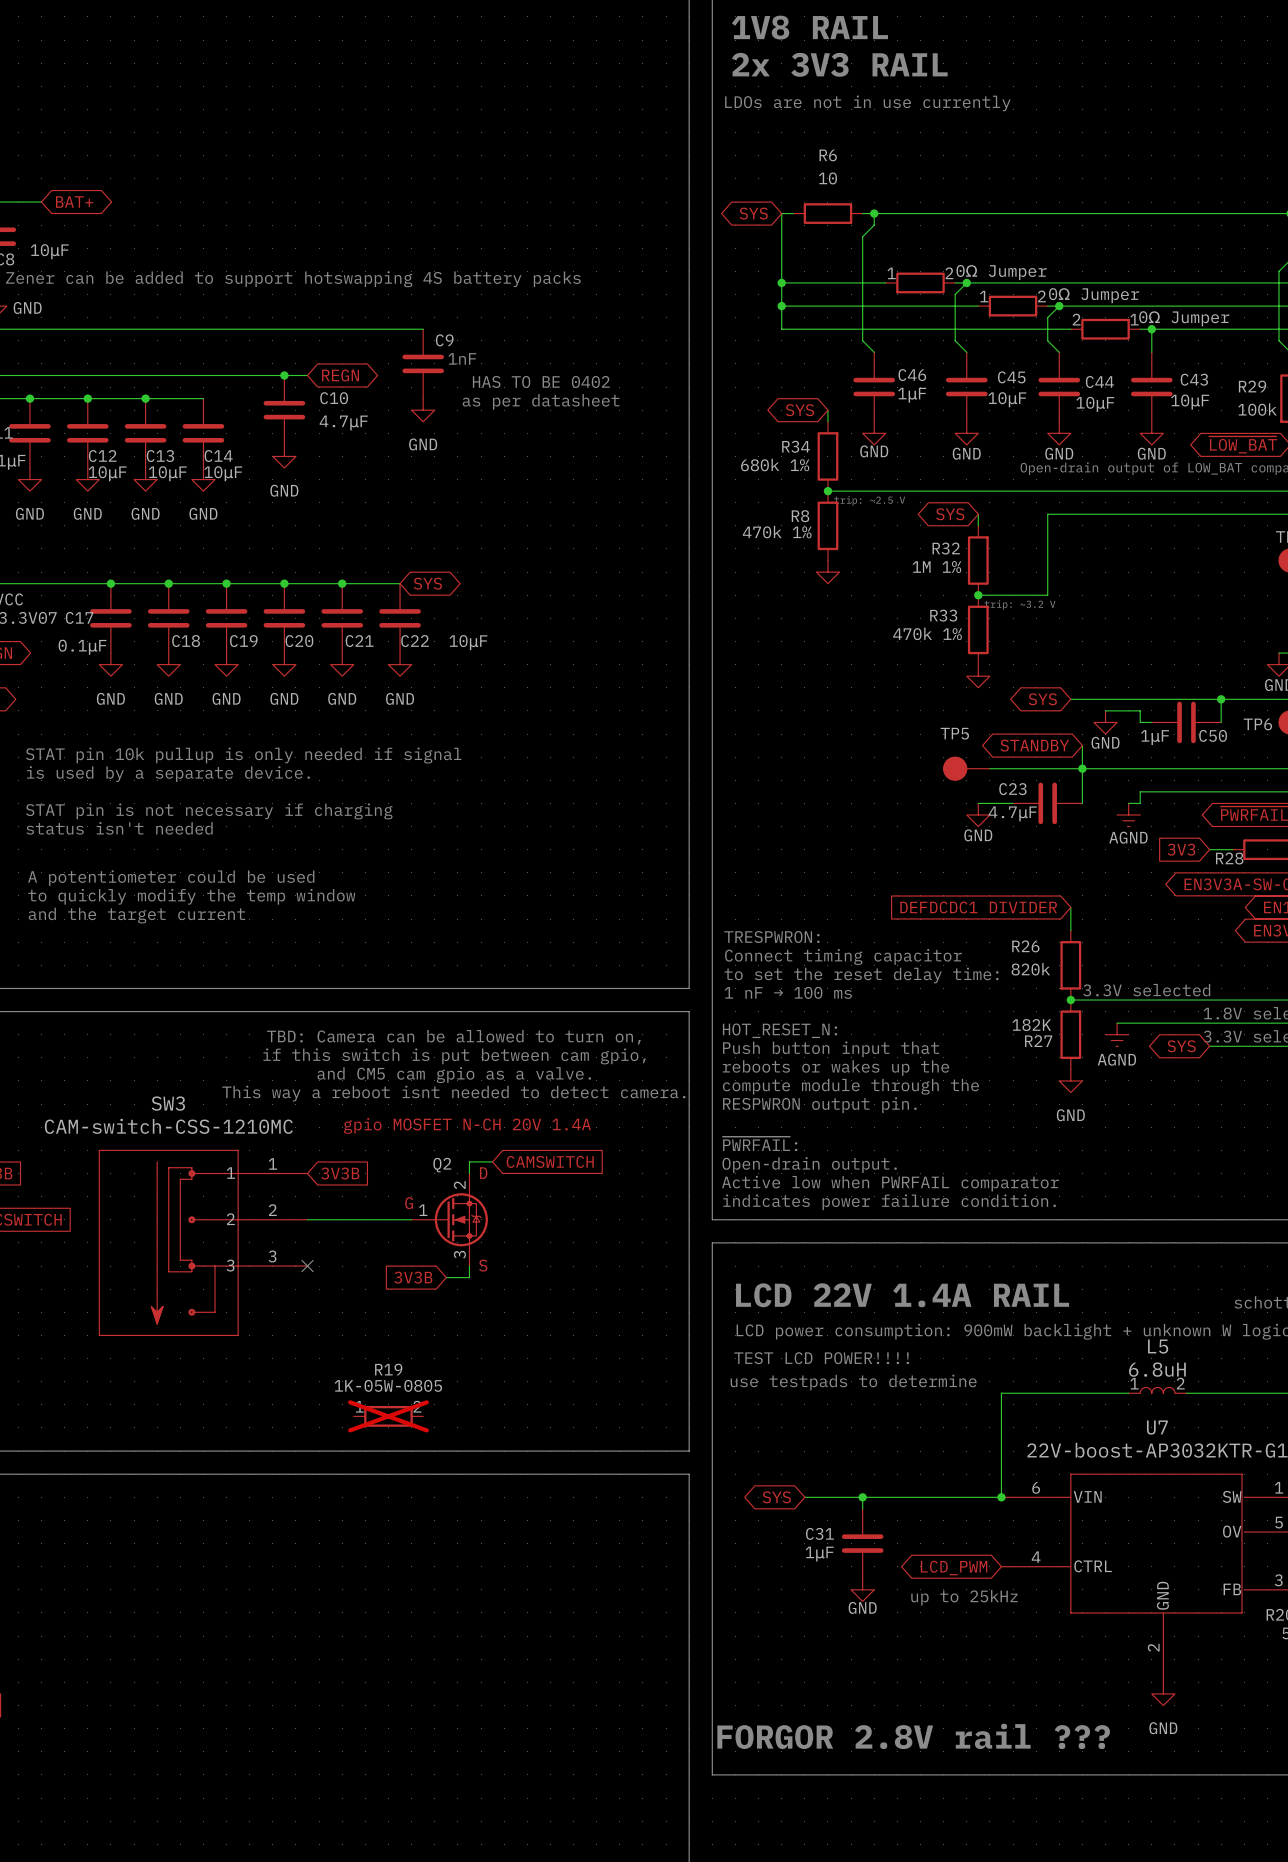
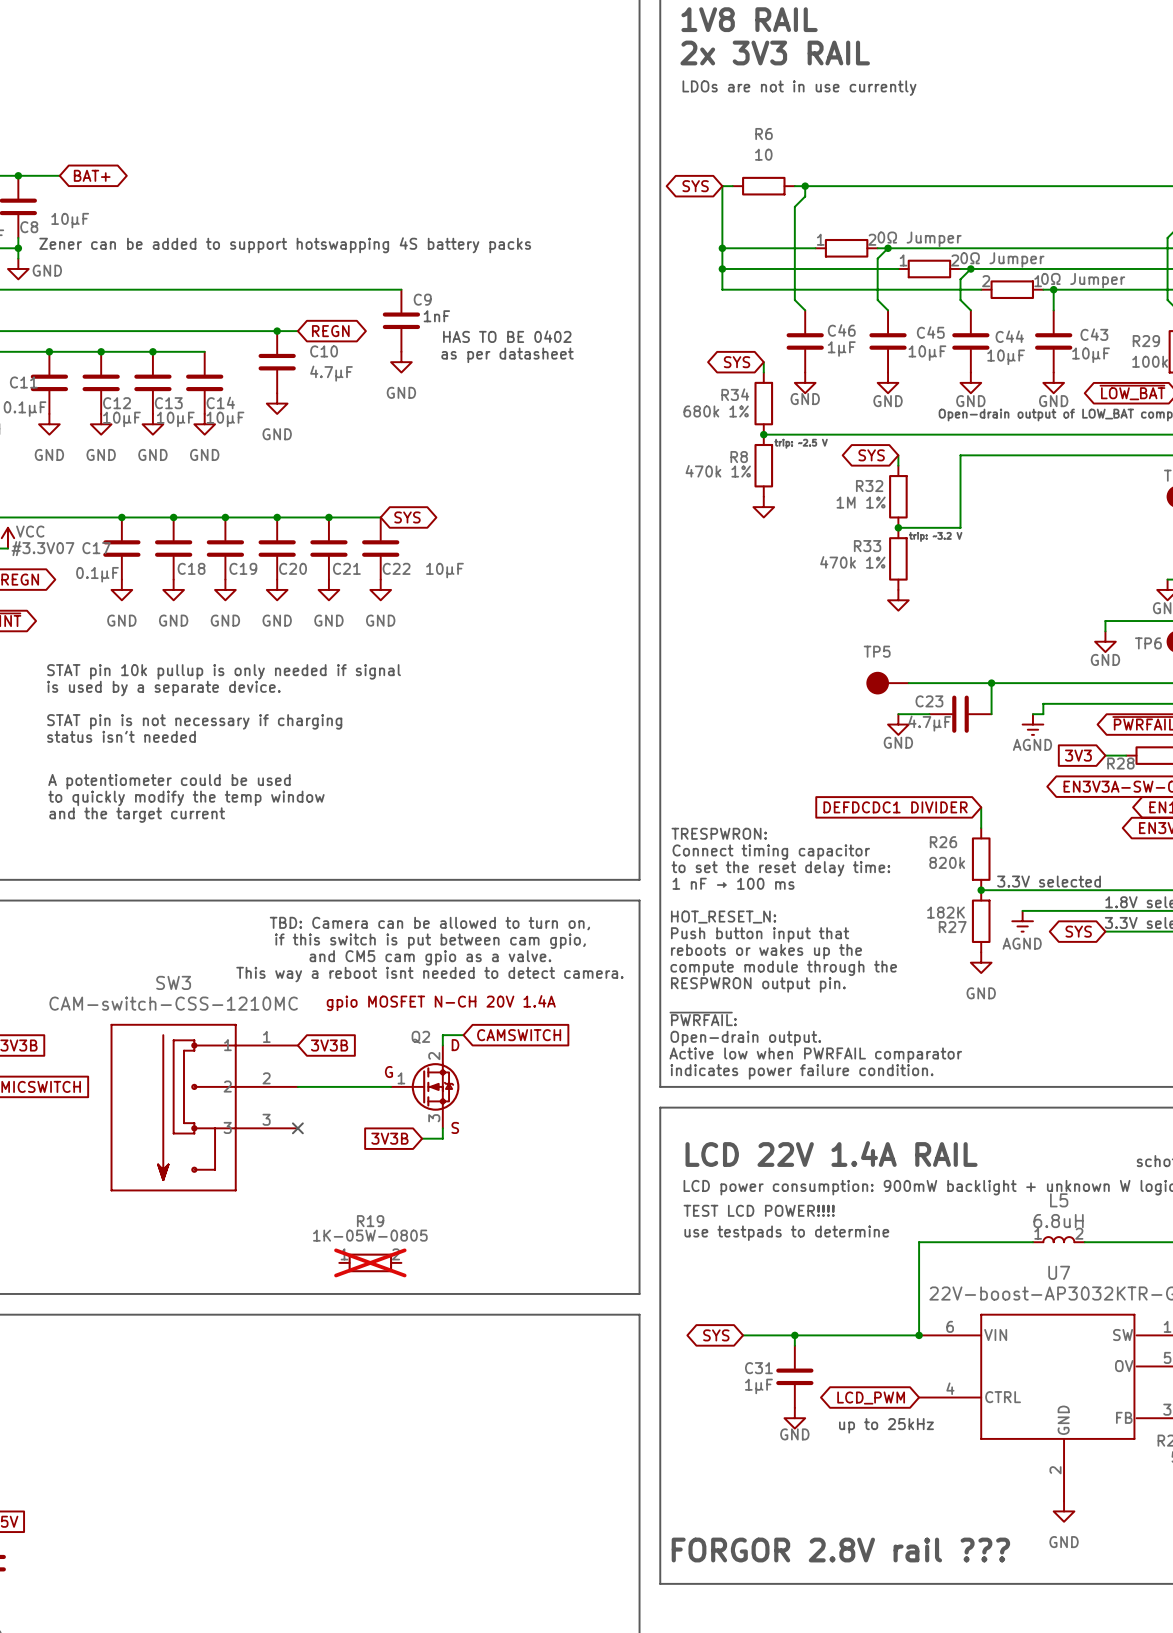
global label: SYS (1042, 699) -> none
wire: (1070, 699) (1209, 699) -> (1105, 631) (1105, 621)
wire: (1221, 699) (1221, 722) -> none
junction: (1221, 699) -> none
wire: (1105, 710) (1140, 710) (1140, 722) (1151, 722) -> none
power symbol position: GND (1105, 722) -> GND (1105, 641)
C50: 1μF (1186, 722) -> none
global label: STANDBY (1034, 745) -> none
wire: (1082, 745) (1082, 768) -> none

